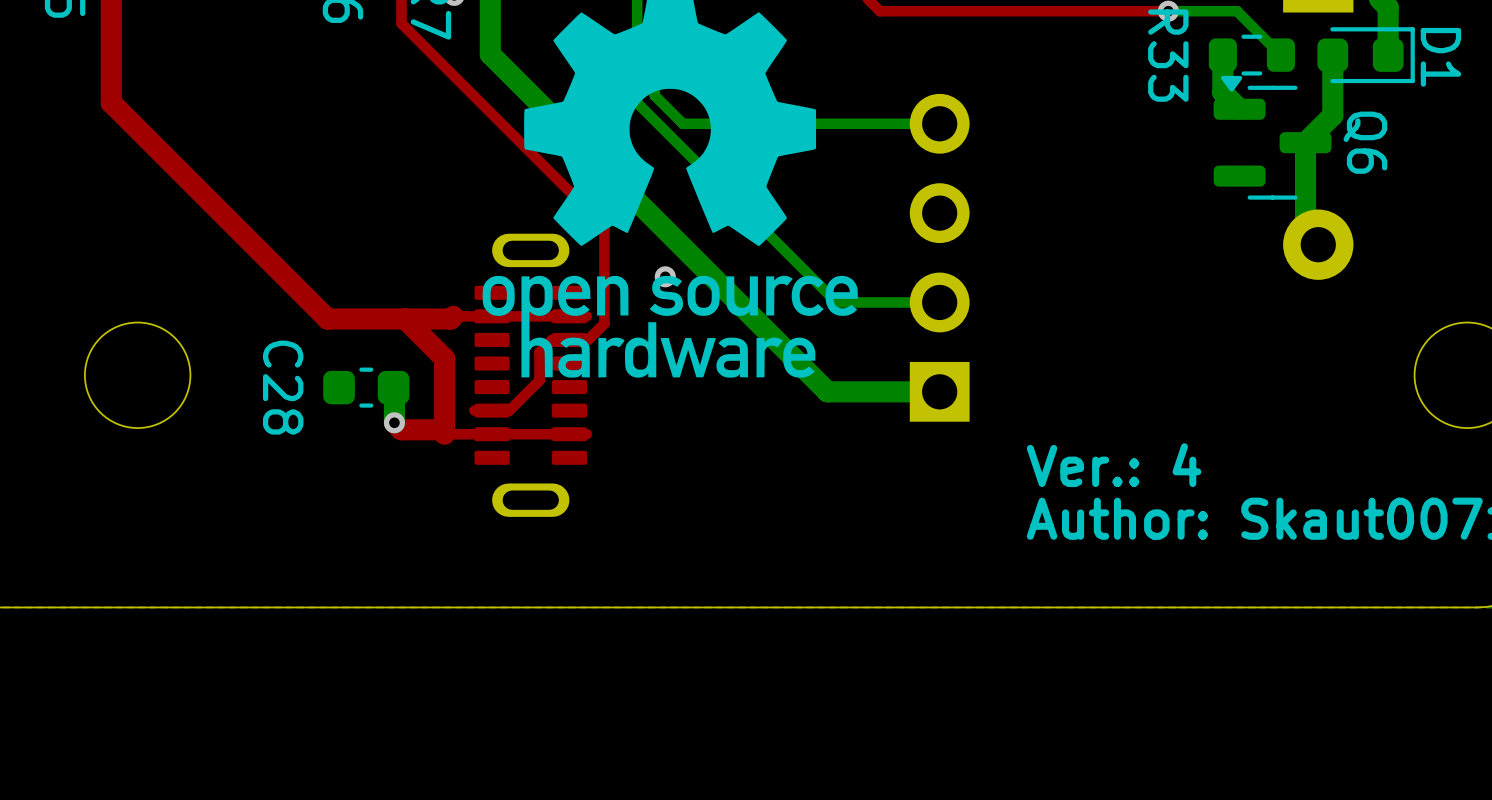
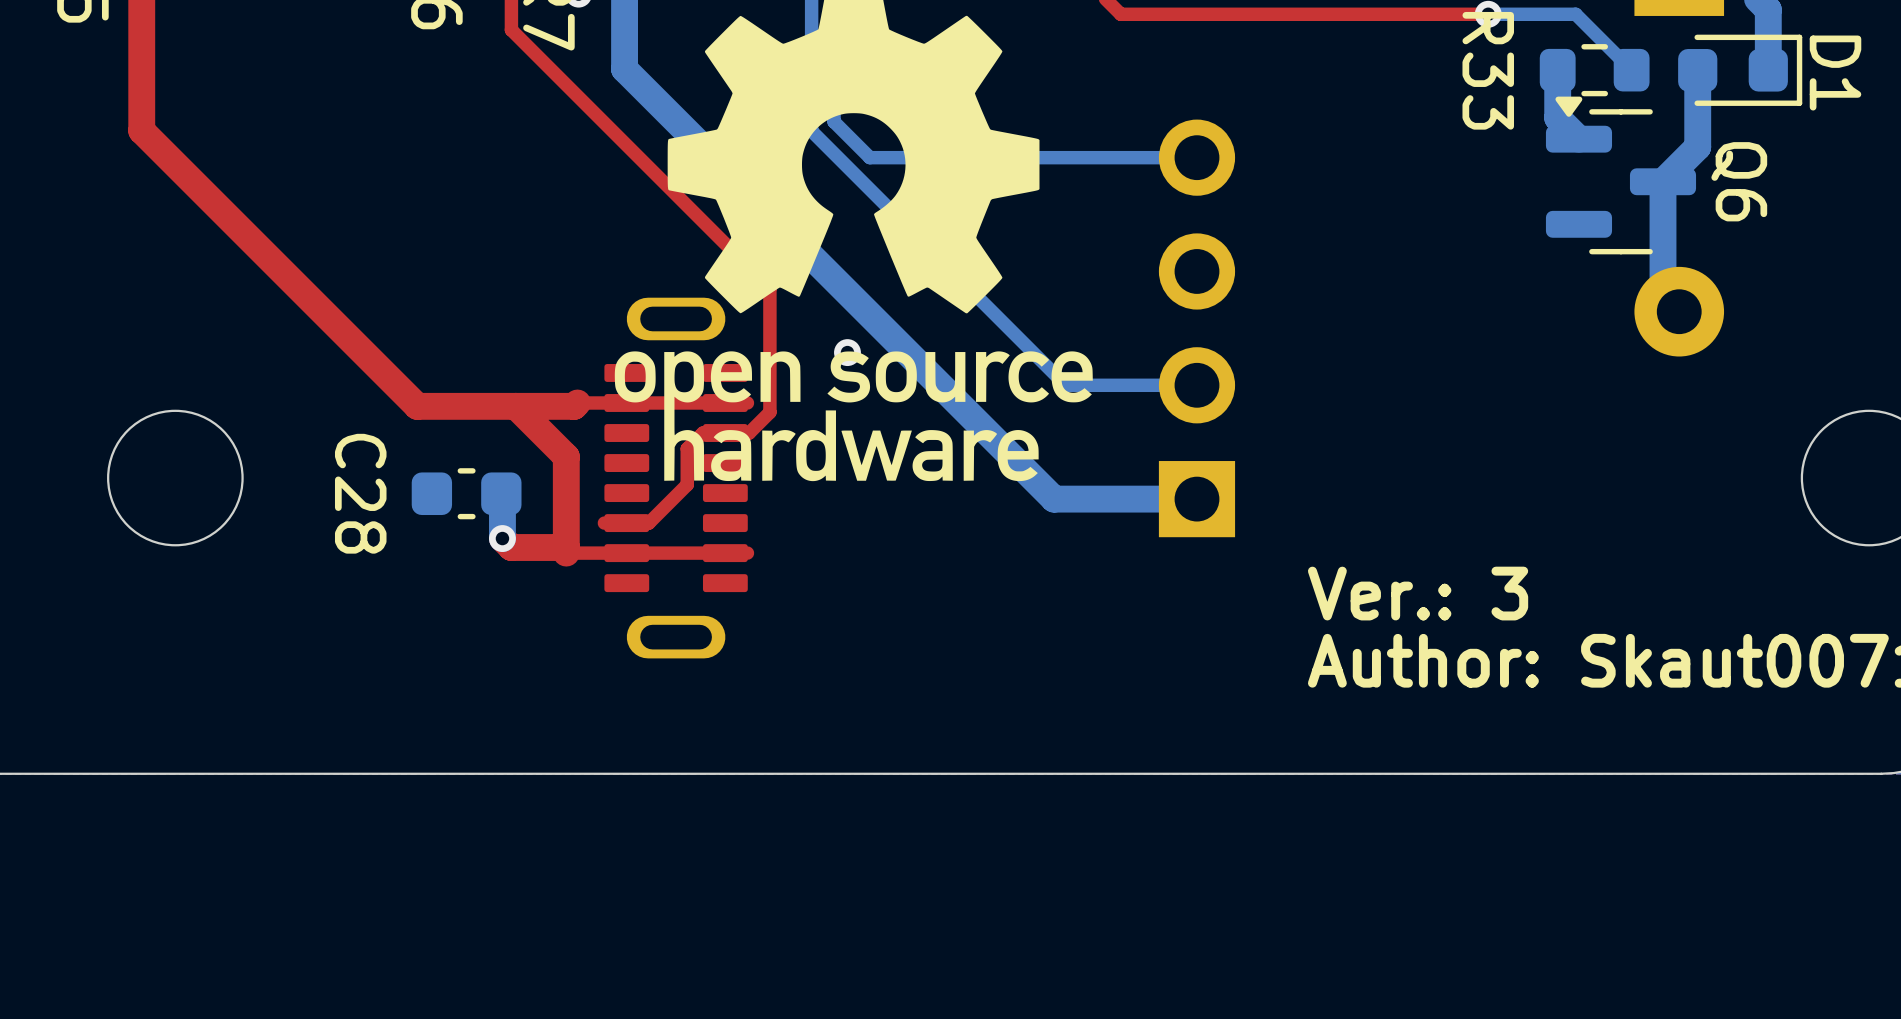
text: Ver.: 4 (1114, 465) -> Ver.: 3 (1418, 593)

